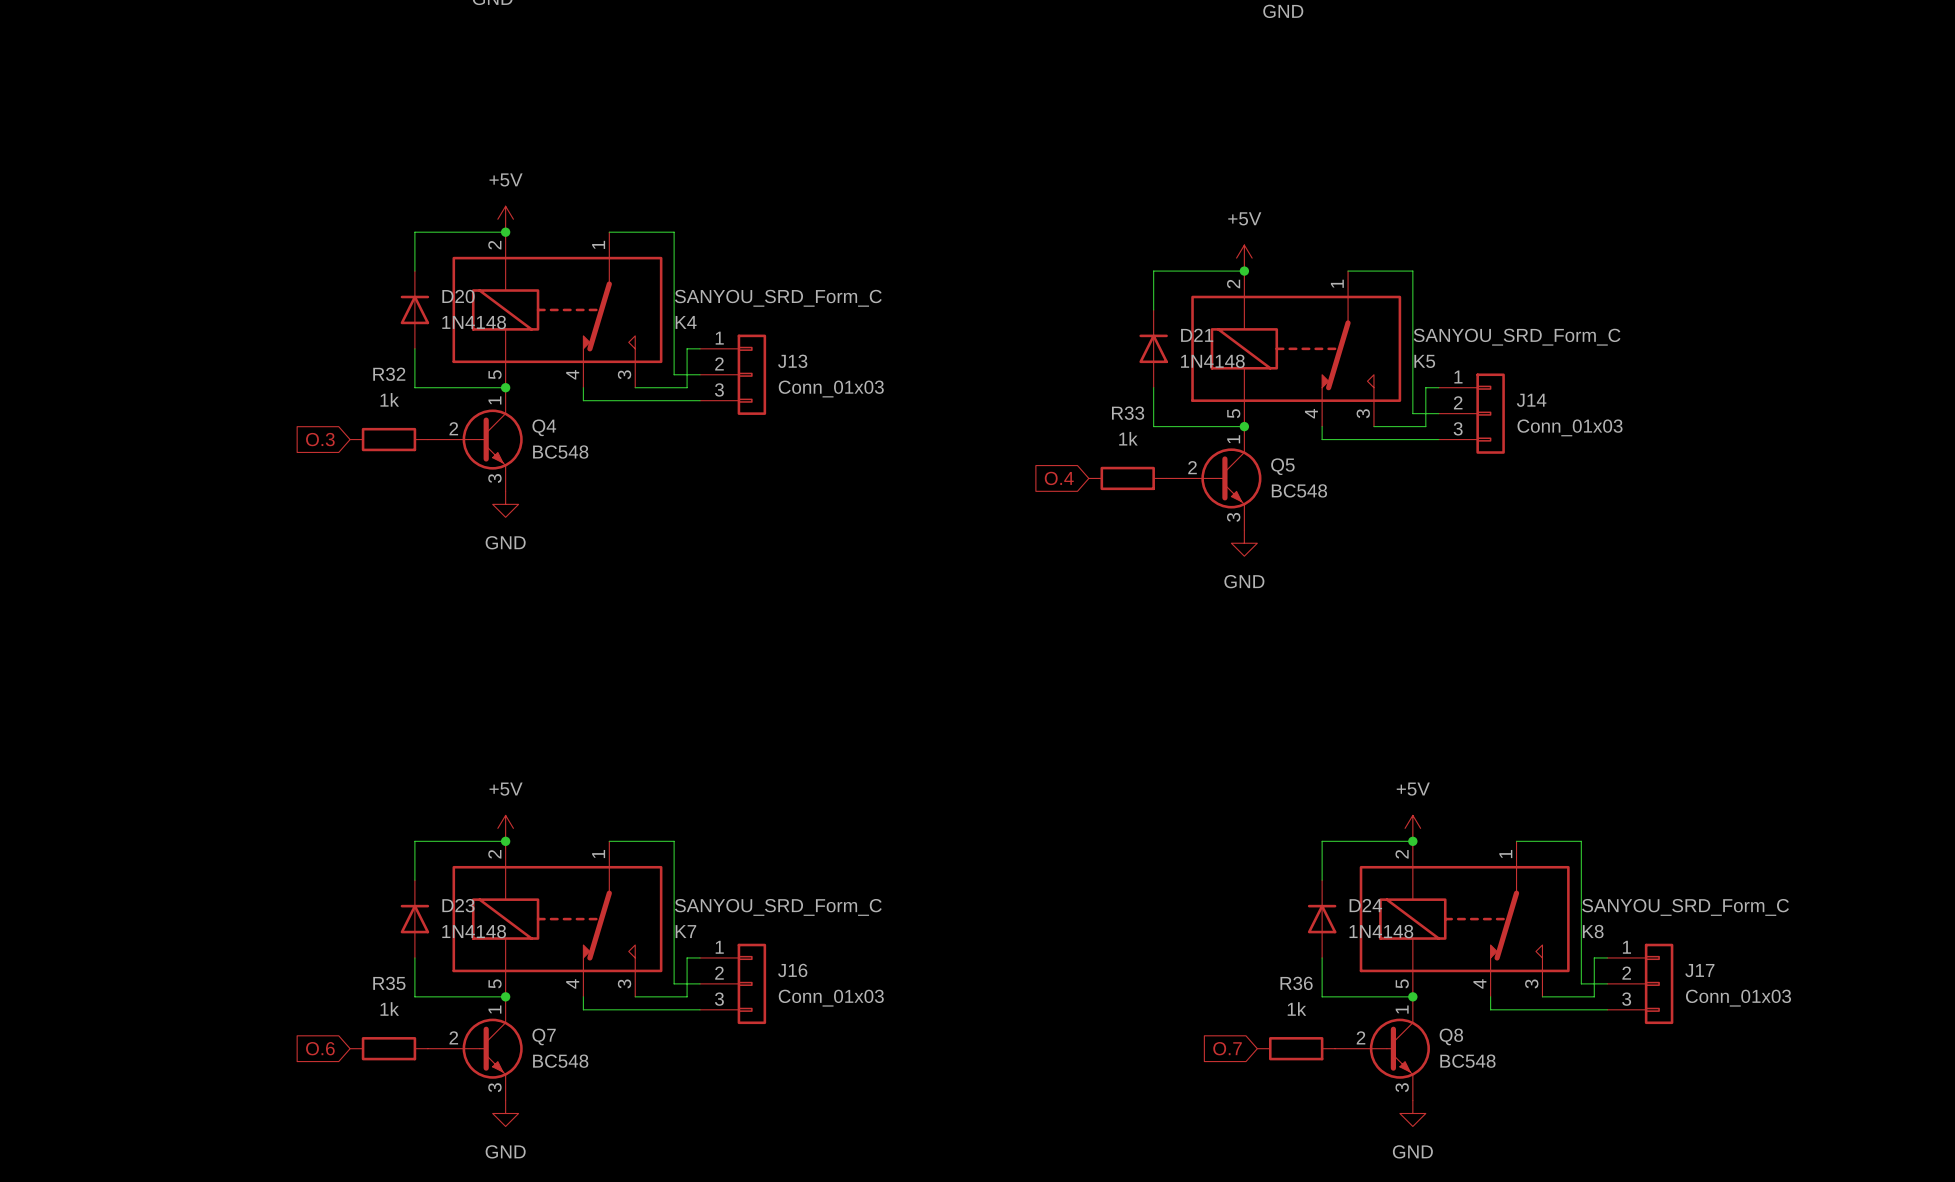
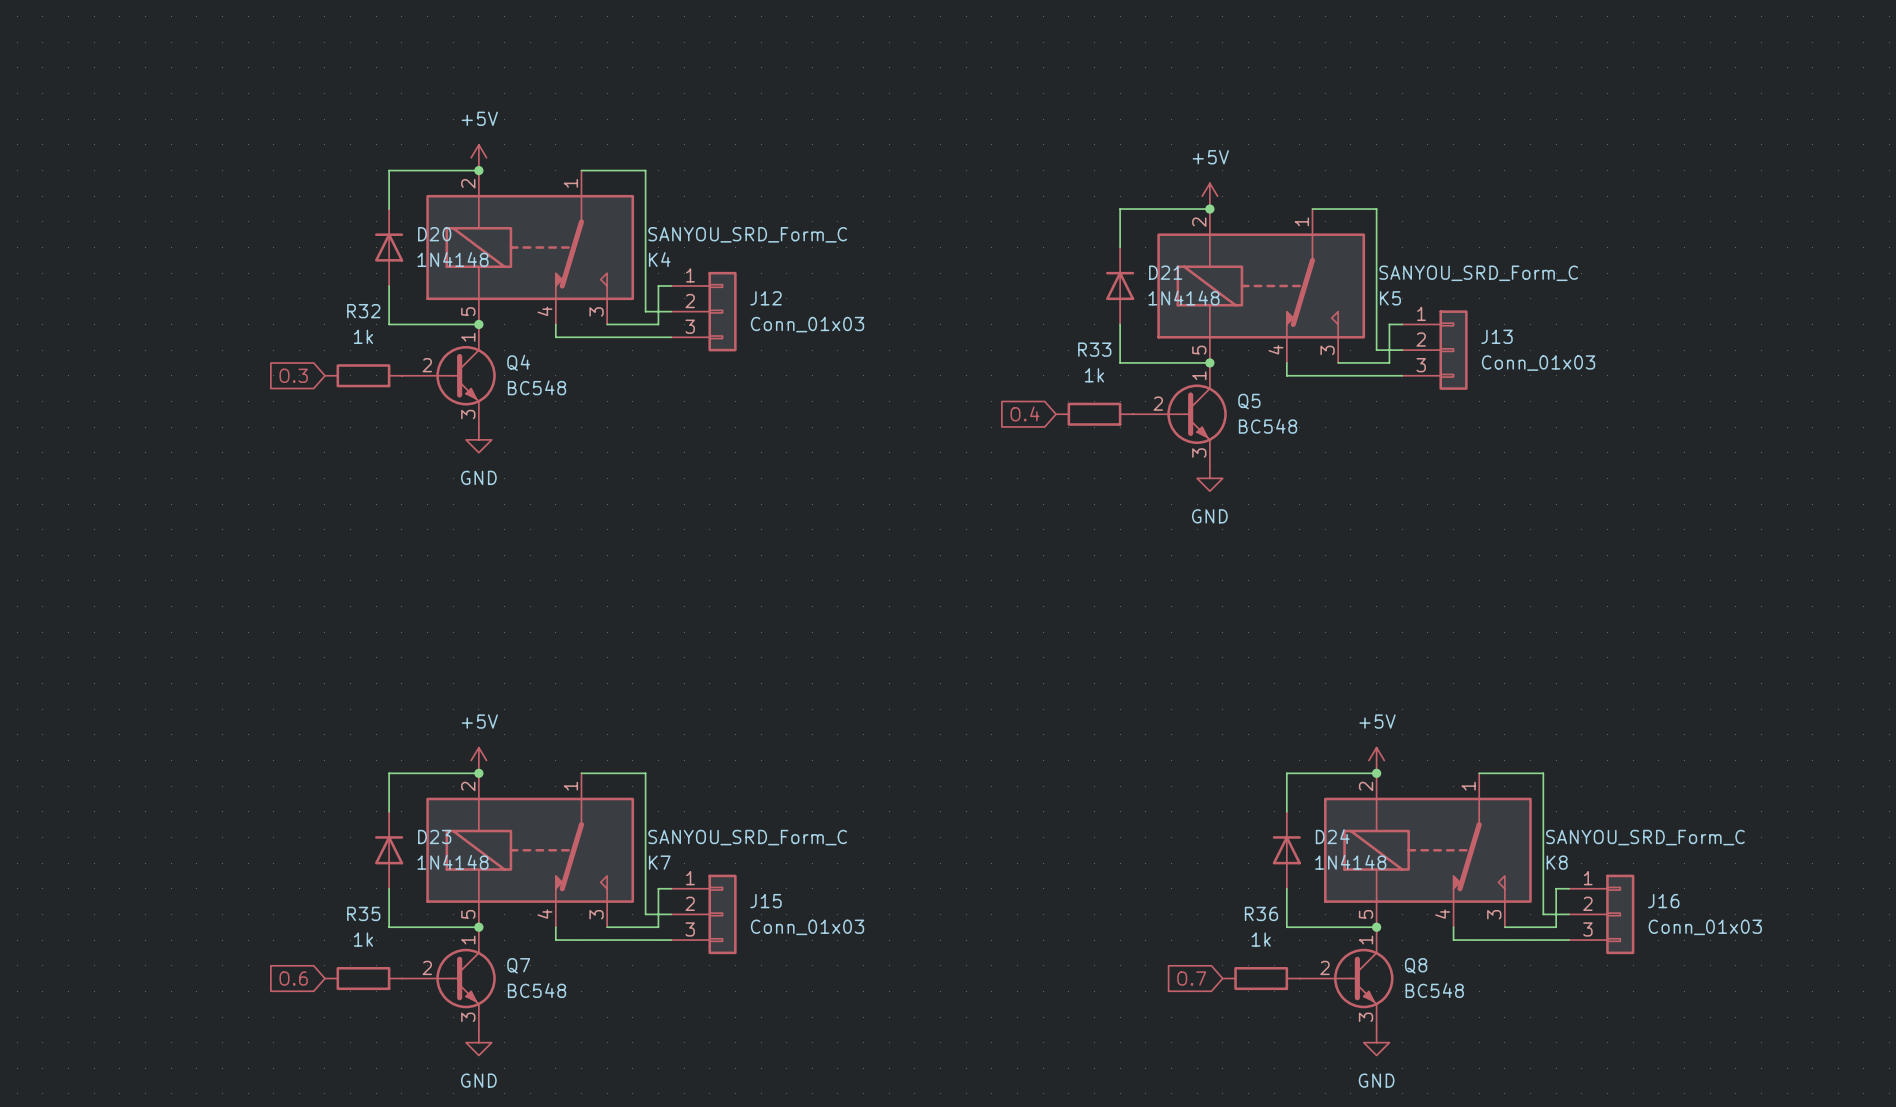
J13 name: J13 (792, 361) -> J12 (766, 298)
J14 name: J14 (1531, 400) -> J13 (1497, 336)
J16 name: J16 (792, 970) -> J15 (766, 901)
J17 name: J17 (1699, 970) -> J16 (1663, 901)

